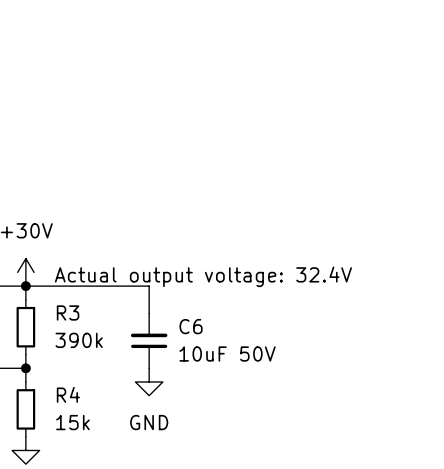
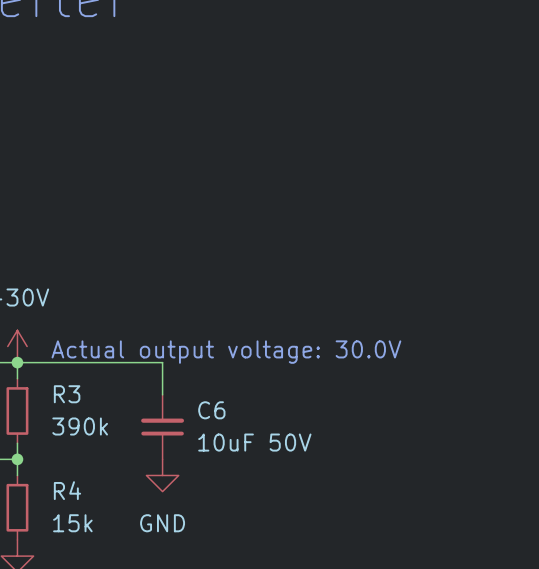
text: Actual output voltage: 32.4V (203, 276) -> Actual output voltage: 30.0V (226, 352)

